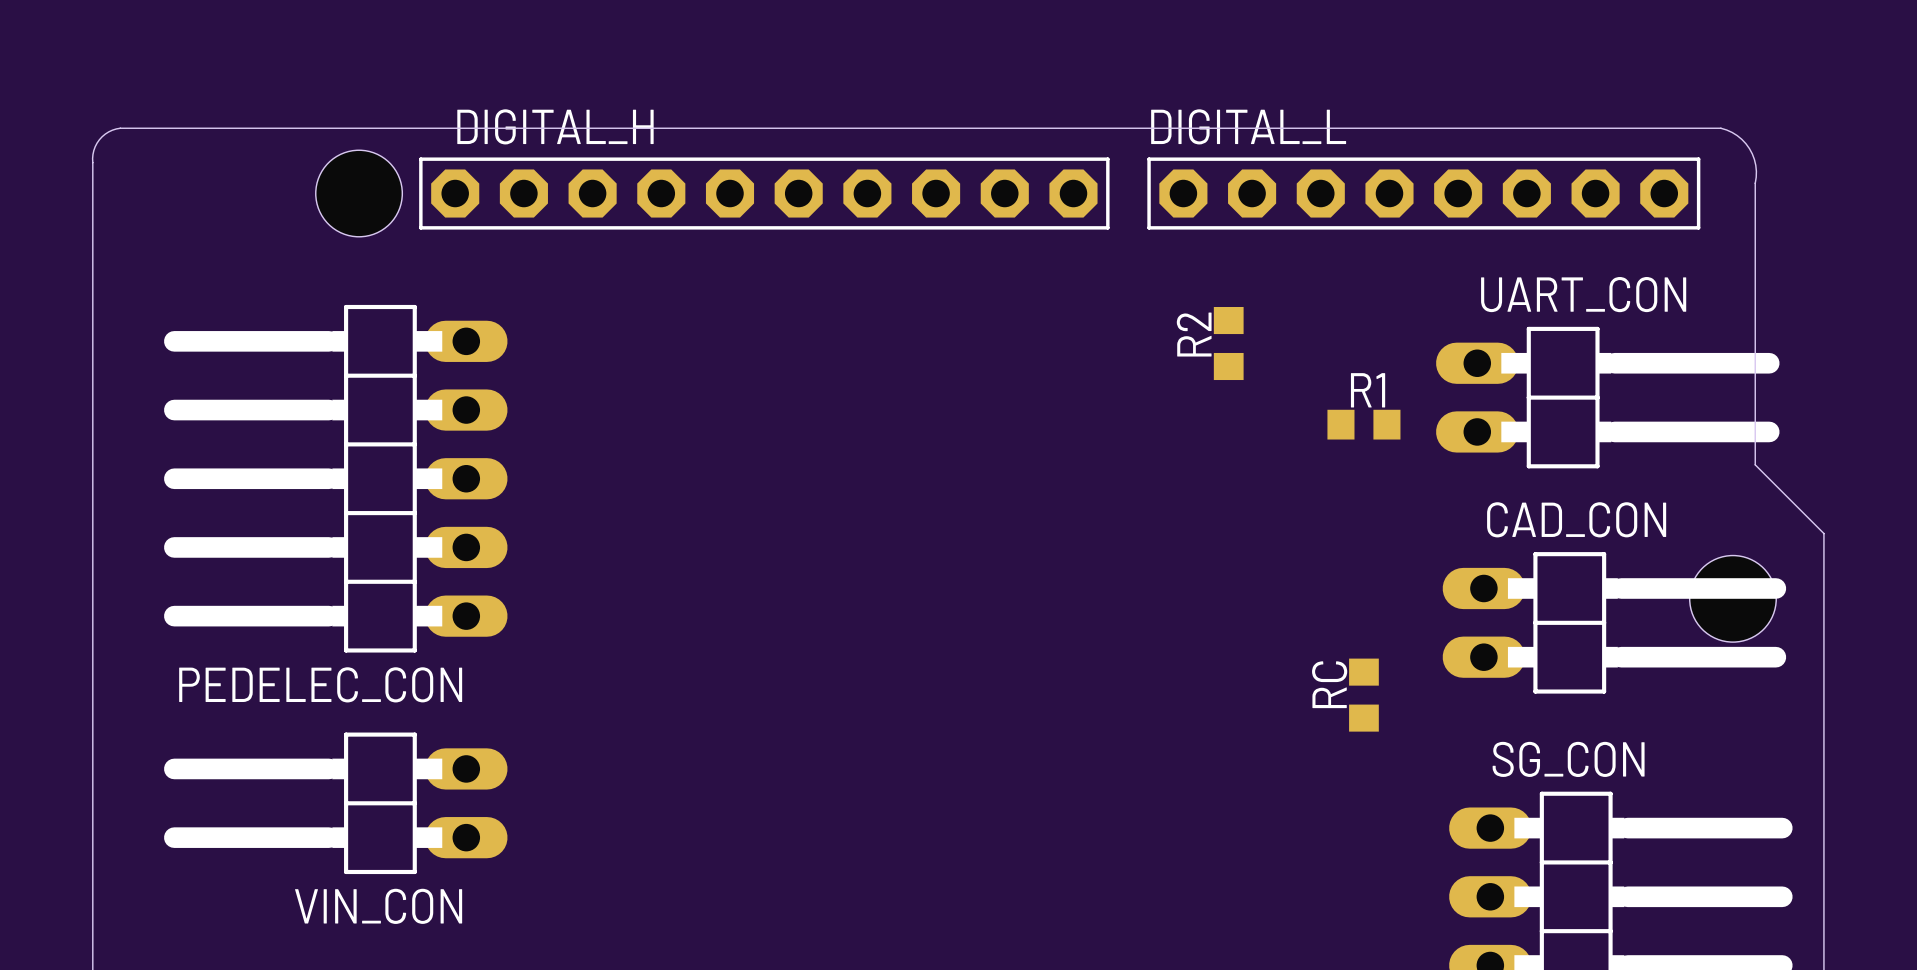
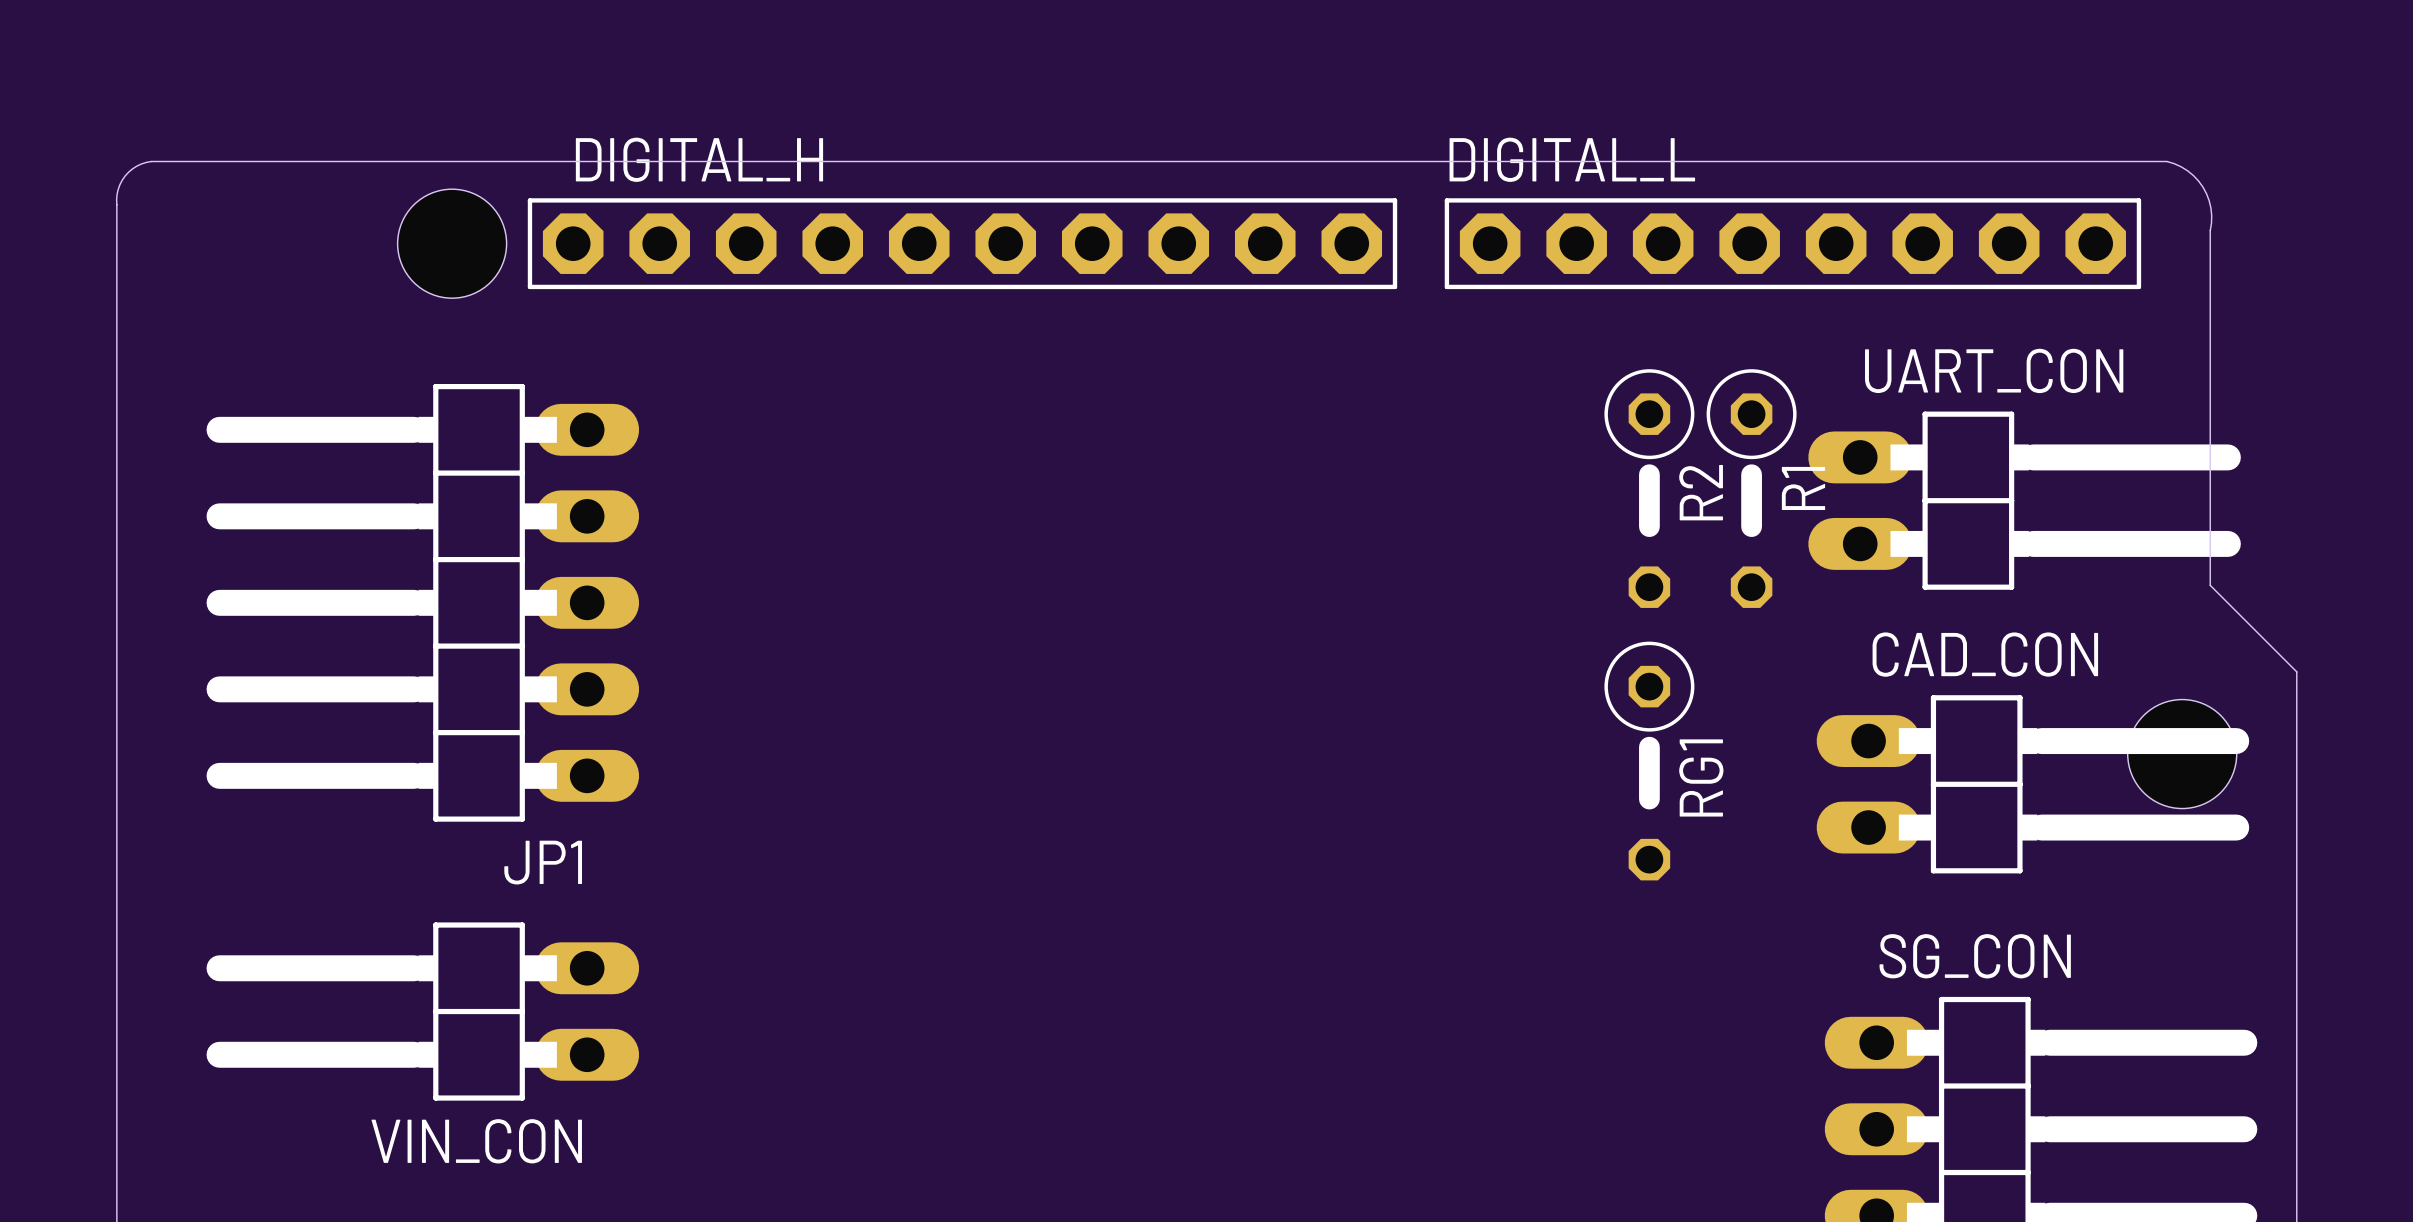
R2 footprint: [1213, 307, 1244, 381] -> [1604, 369, 1695, 608]
R2 name position: R2 (1194, 334) -> R2 (1701, 492)
R1 name position: R1 (1368, 390) -> R1 (1803, 488)
R1 footprint: [1327, 409, 1401, 440] -> [1706, 369, 1797, 608]
RG1: none -> (1649, 761)
PEDELEC_CON name: PEDELEC_CON (320, 684) -> JP1 (543, 862)
RC: (1363, 695) -> none

